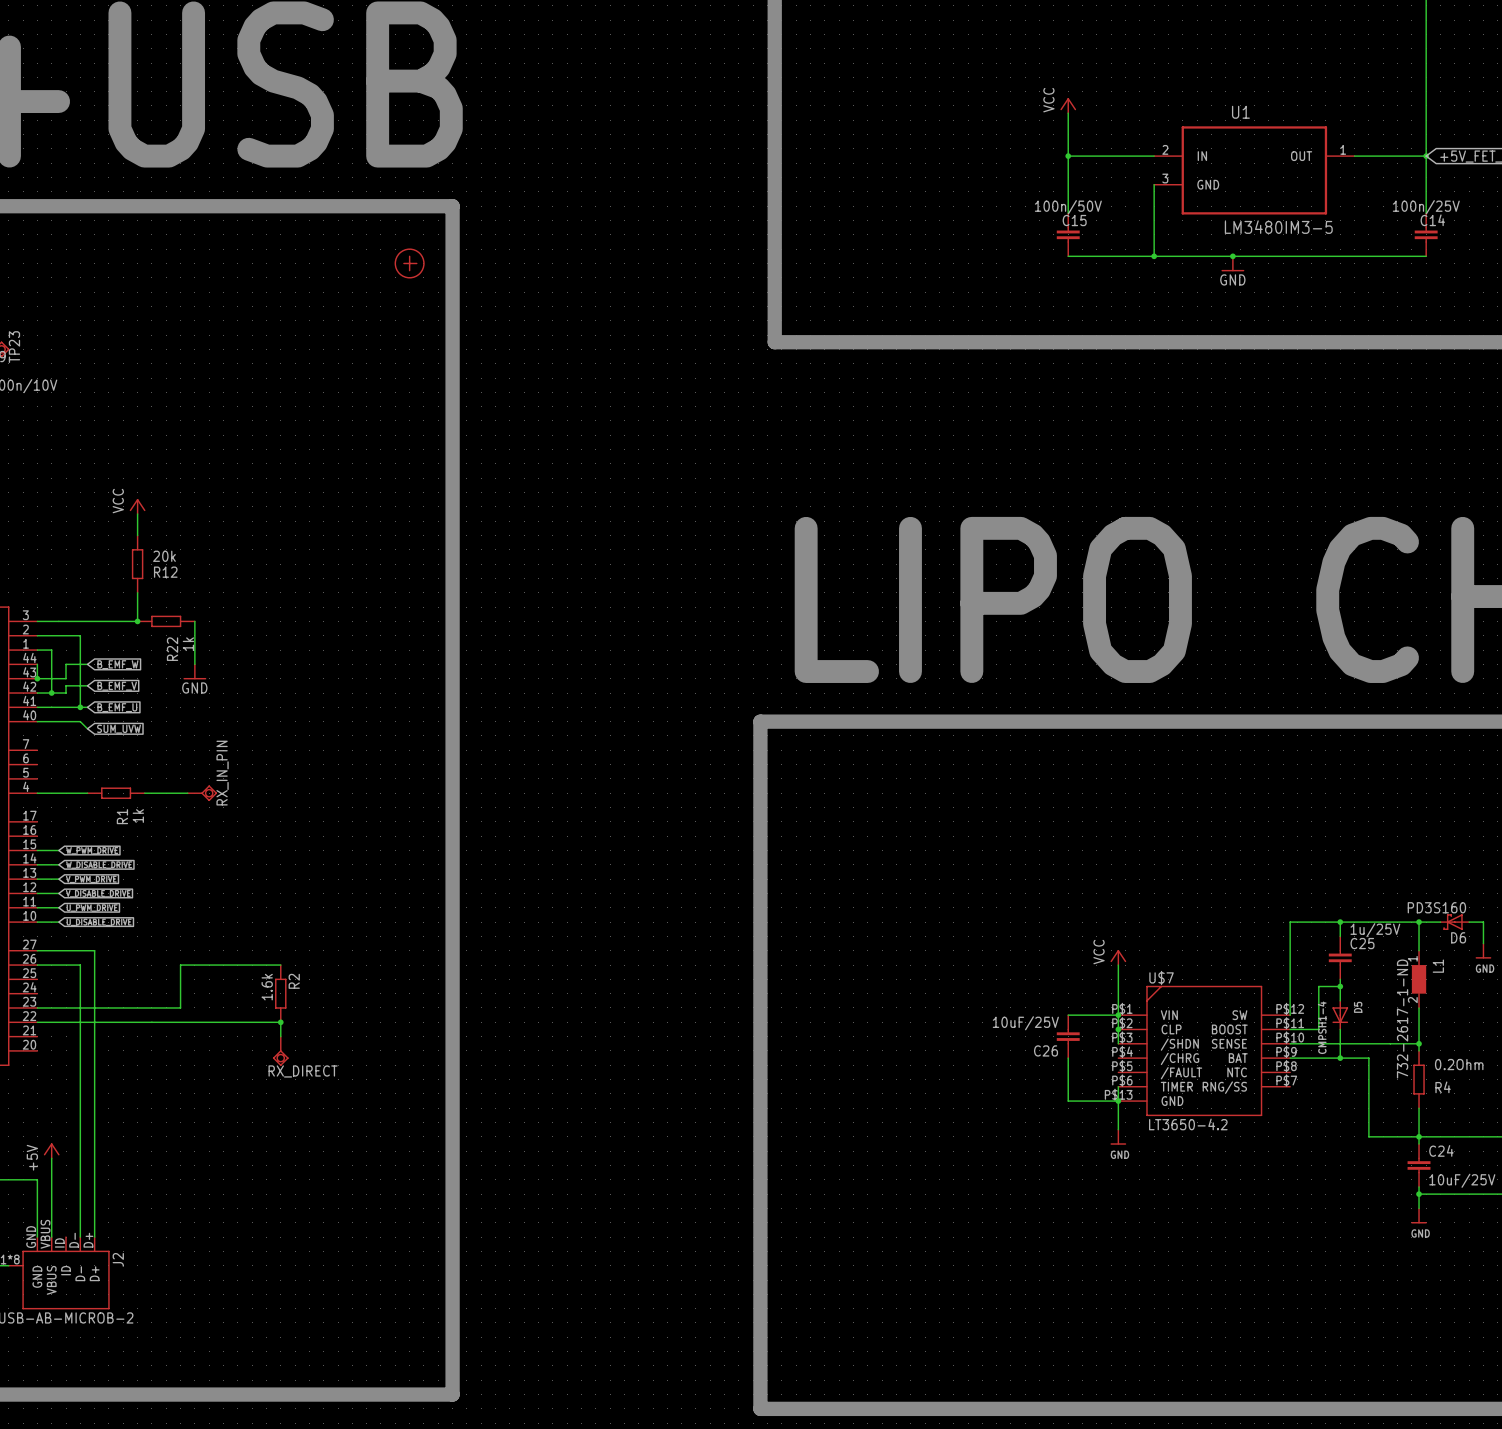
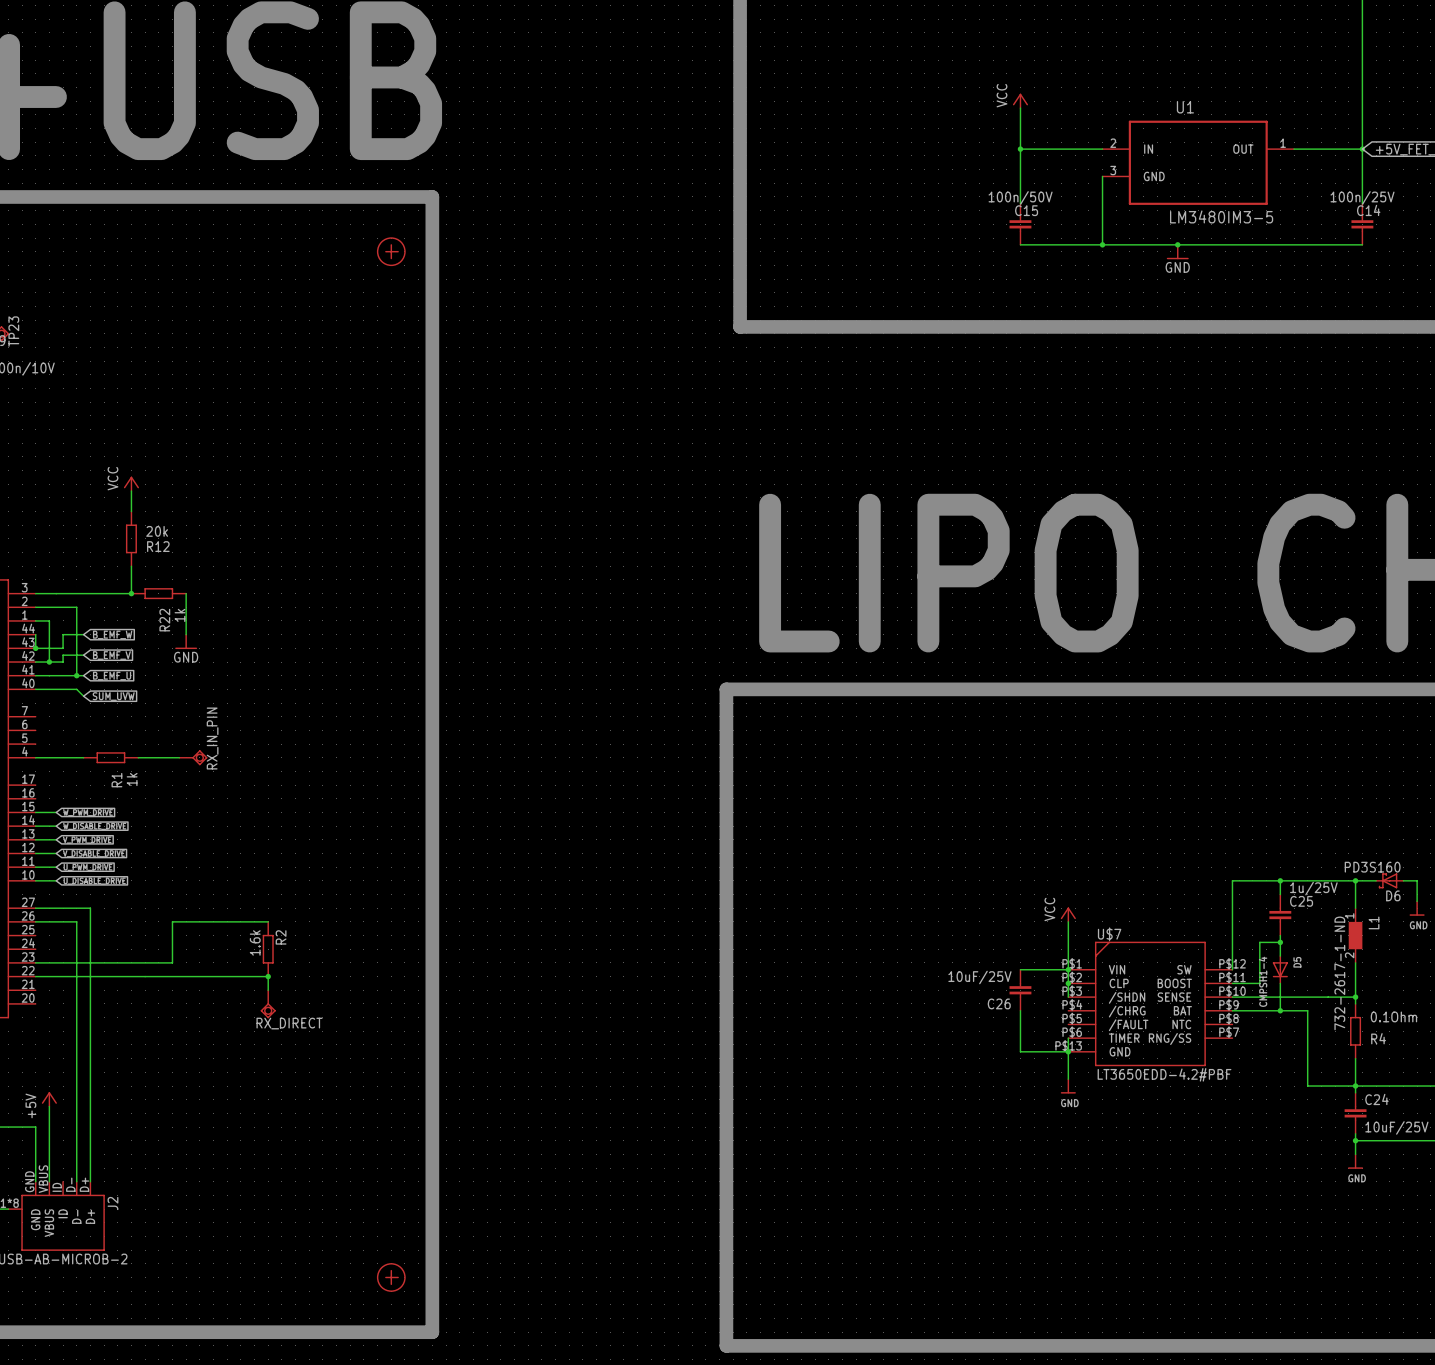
R4 value: 0.2Ohm (1459, 1064) -> 0.1Ohm (1393, 1016)
U$7 value: LT3650-4.2 (1188, 1124) -> LT3650EDD-4.2#PBF (1164, 1074)
part: none -> (391, 1277)

